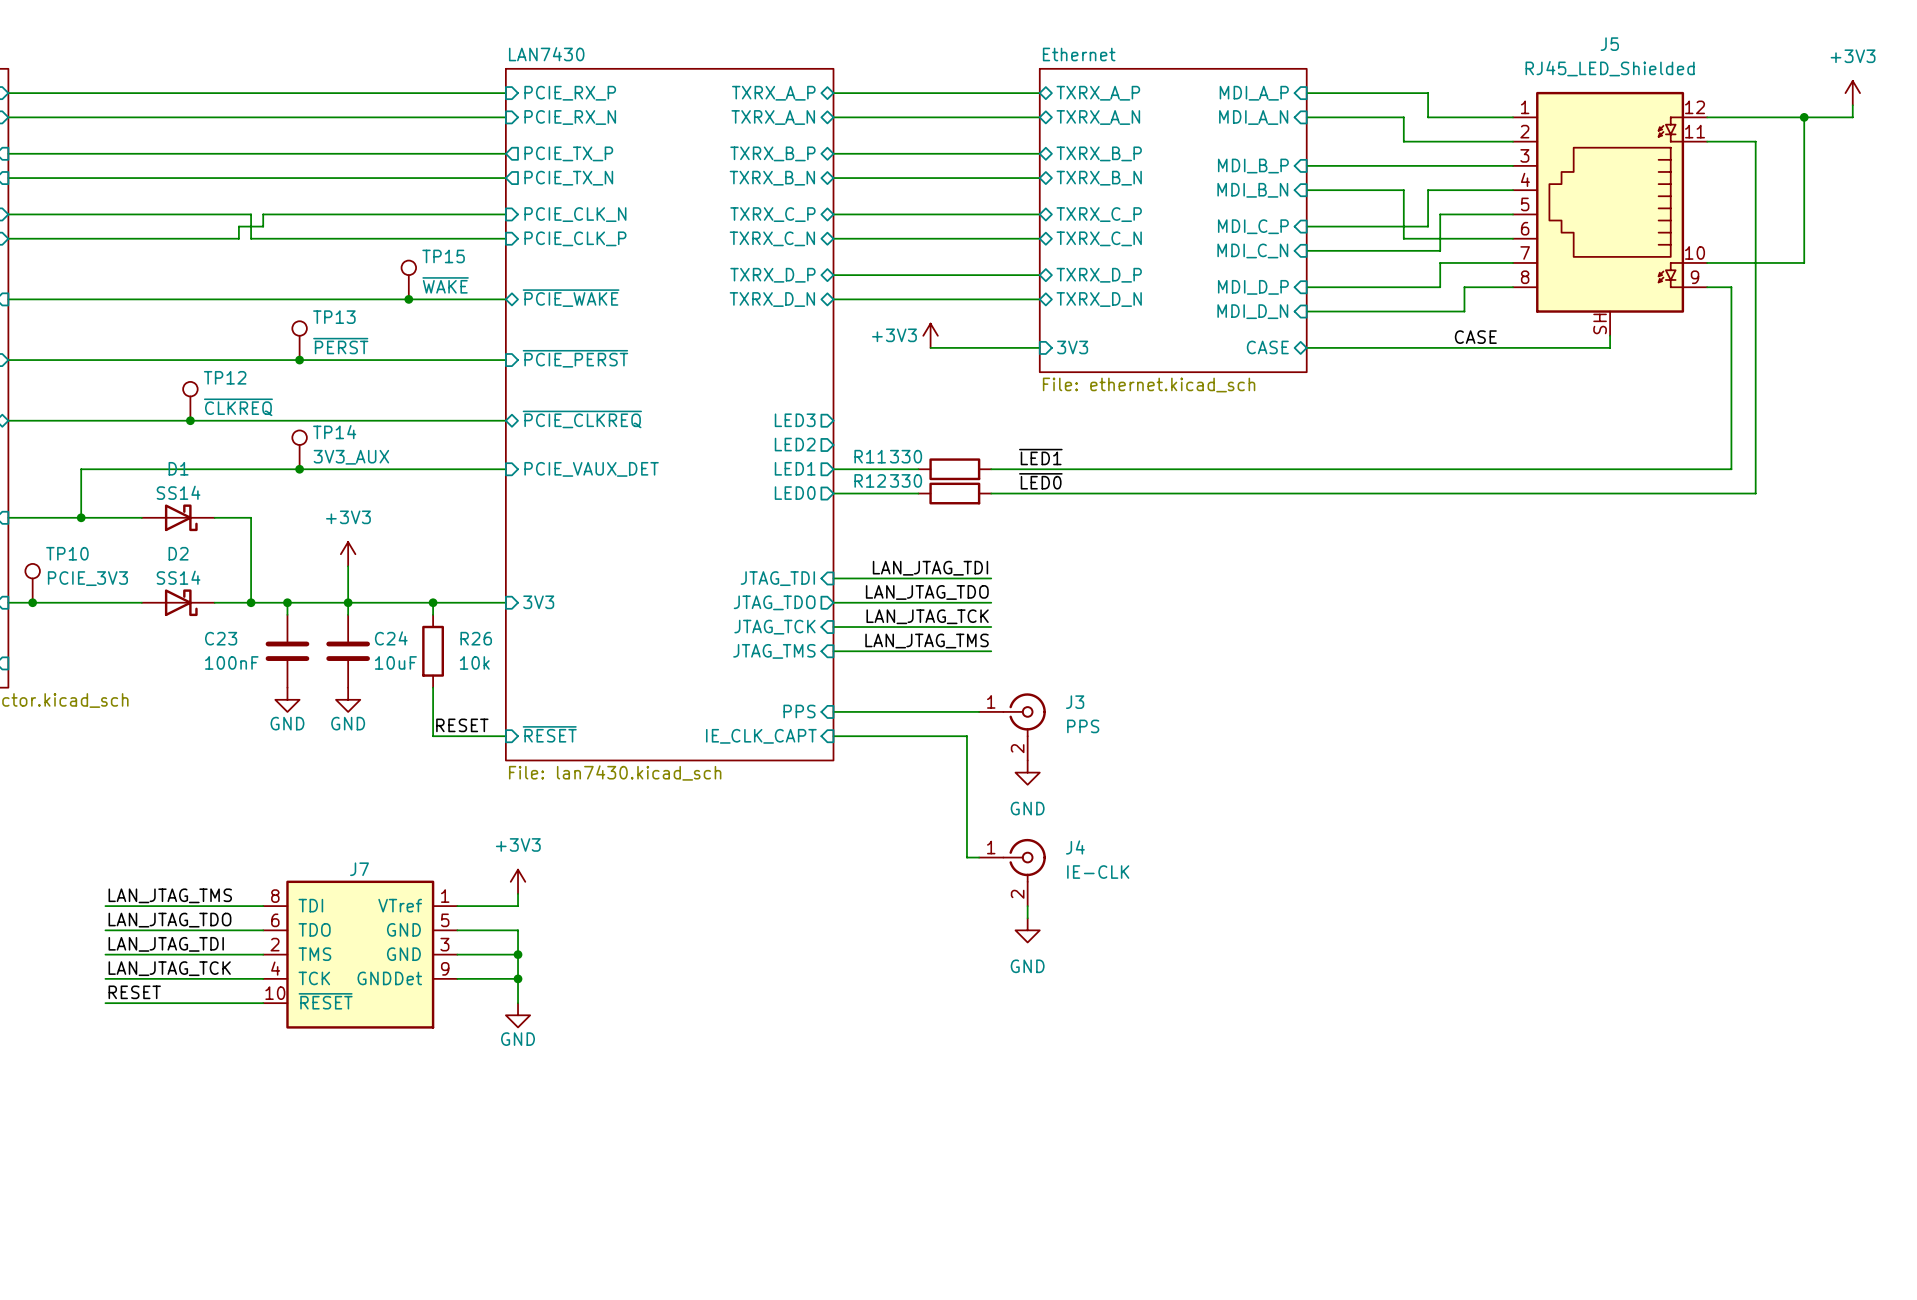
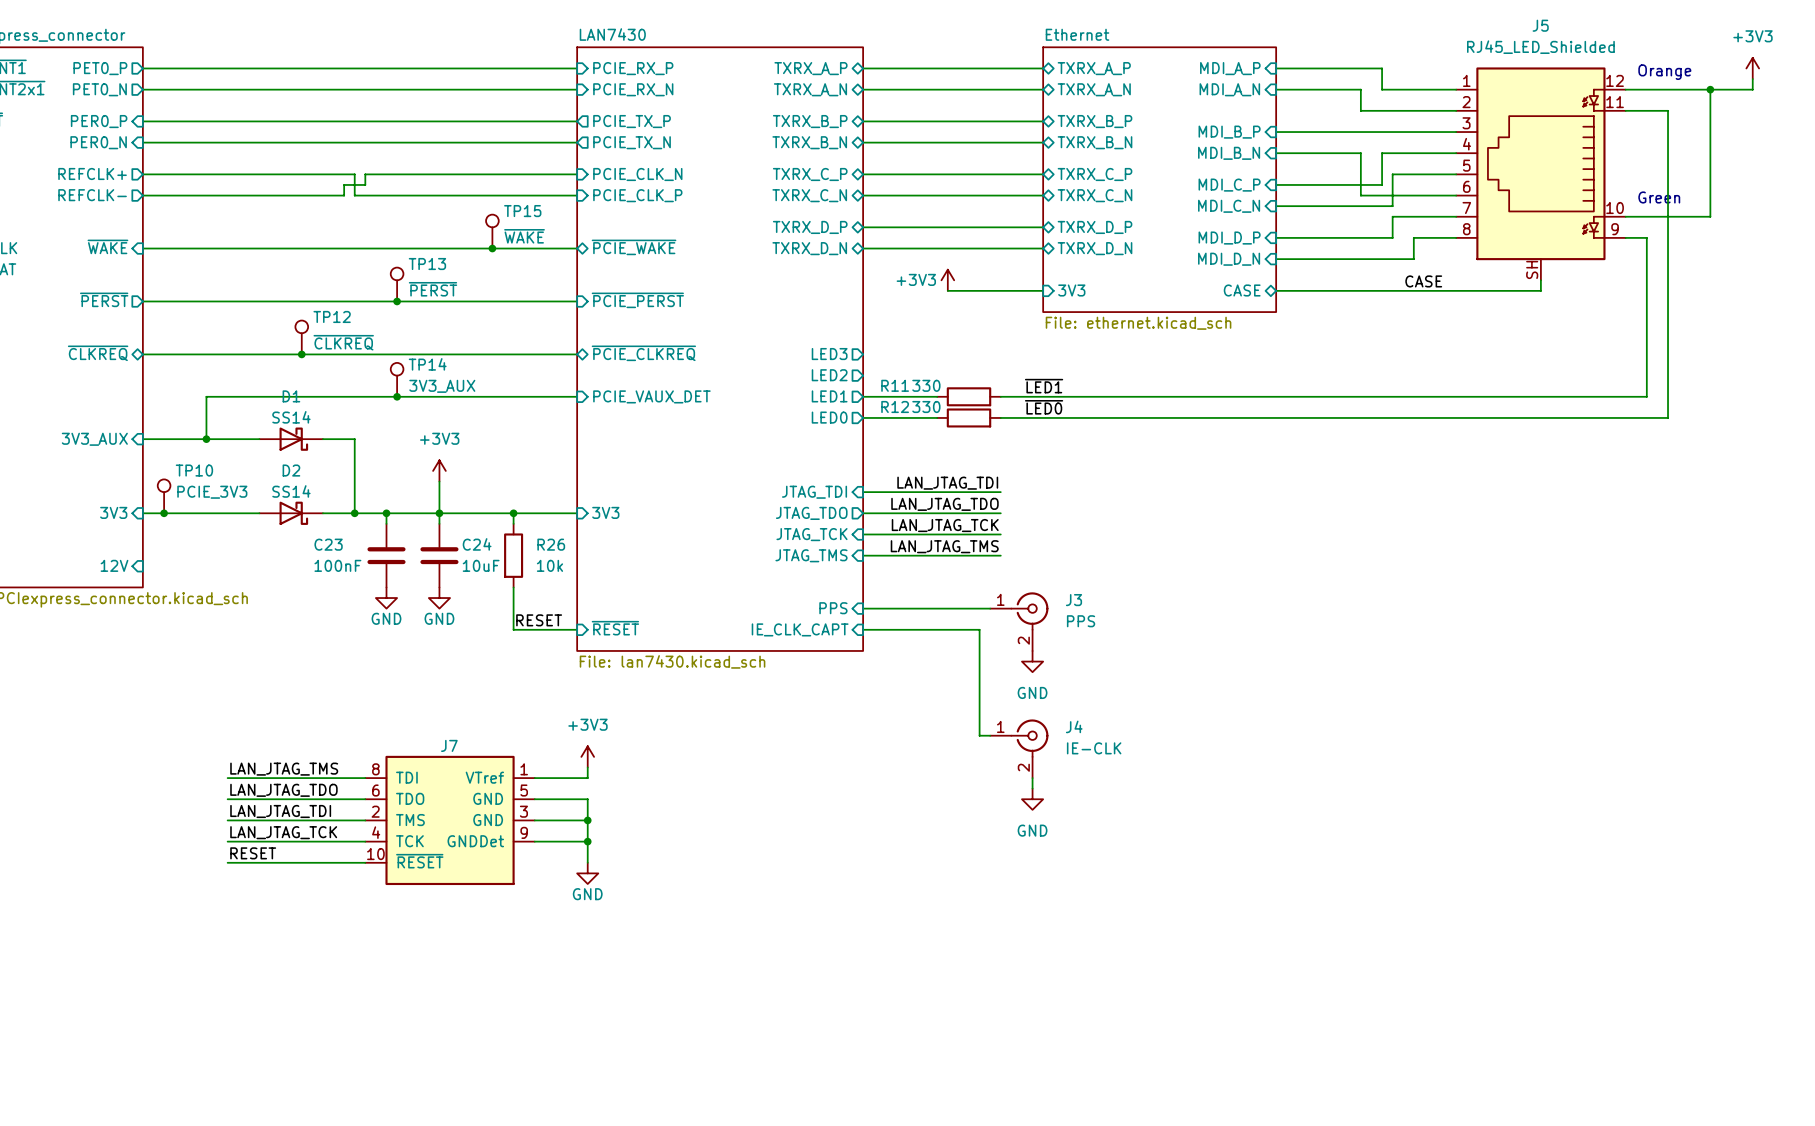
text: none -> Orange (1664, 72)
text: none -> Green (1659, 197)

